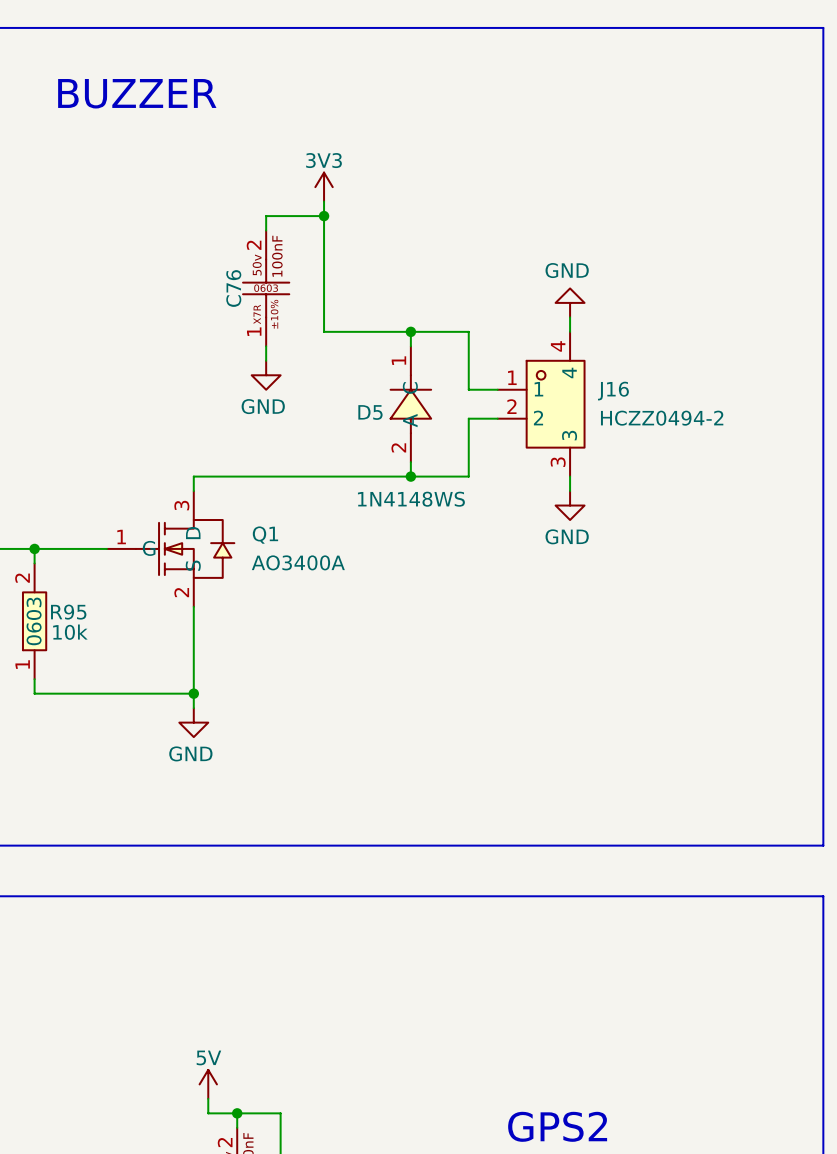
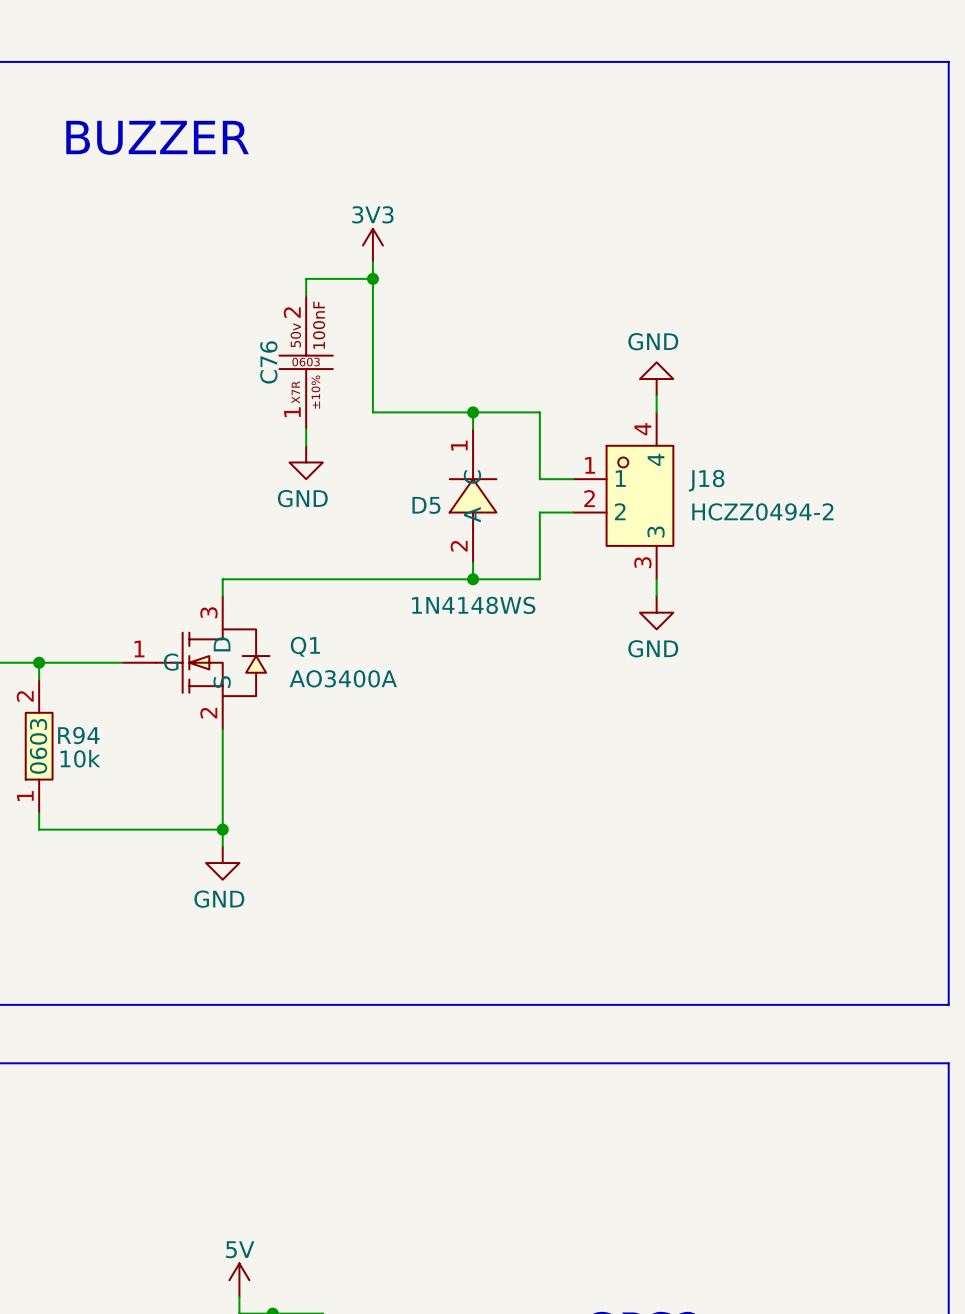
J16 name: J16 (613, 391) -> J18 (706, 480)
R95 name: R95 (68, 612) -> R94 (78, 735)

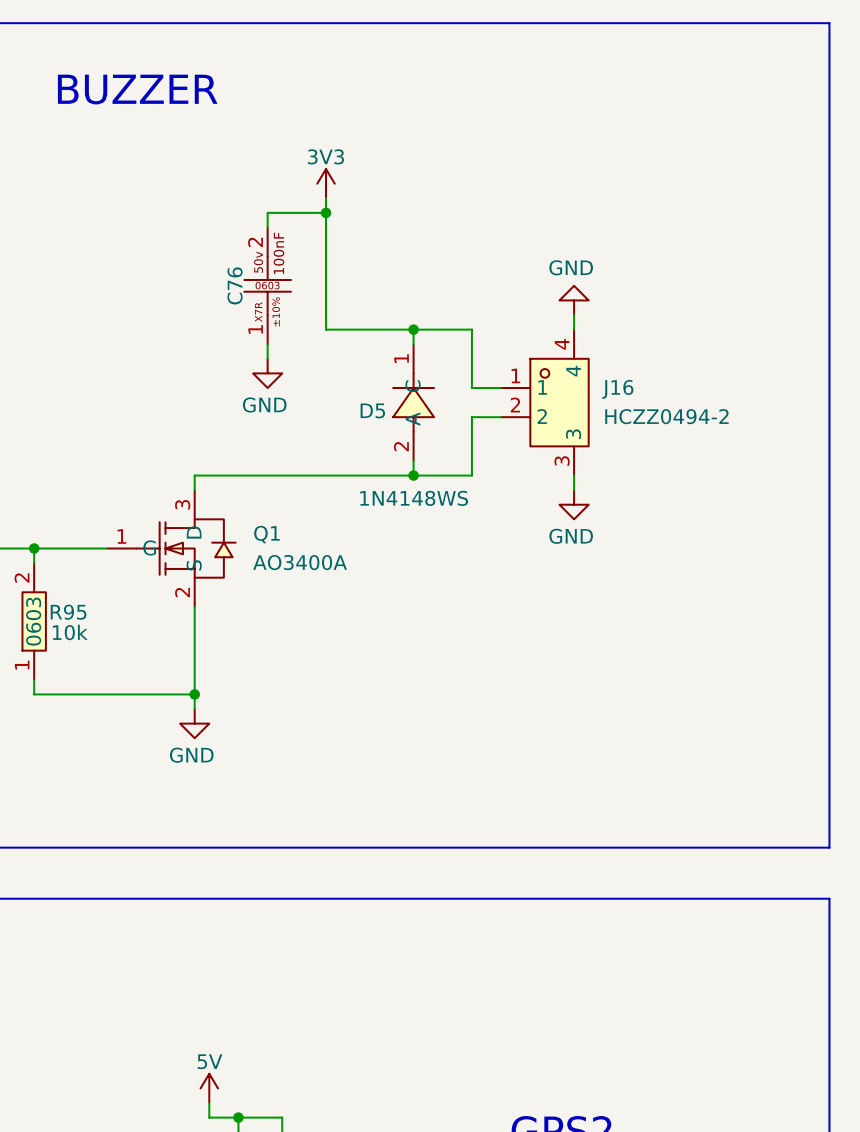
J18 name: J18 (706, 480) -> J16 (617, 389)
R94 name: R94 (78, 735) -> R95 (68, 612)

